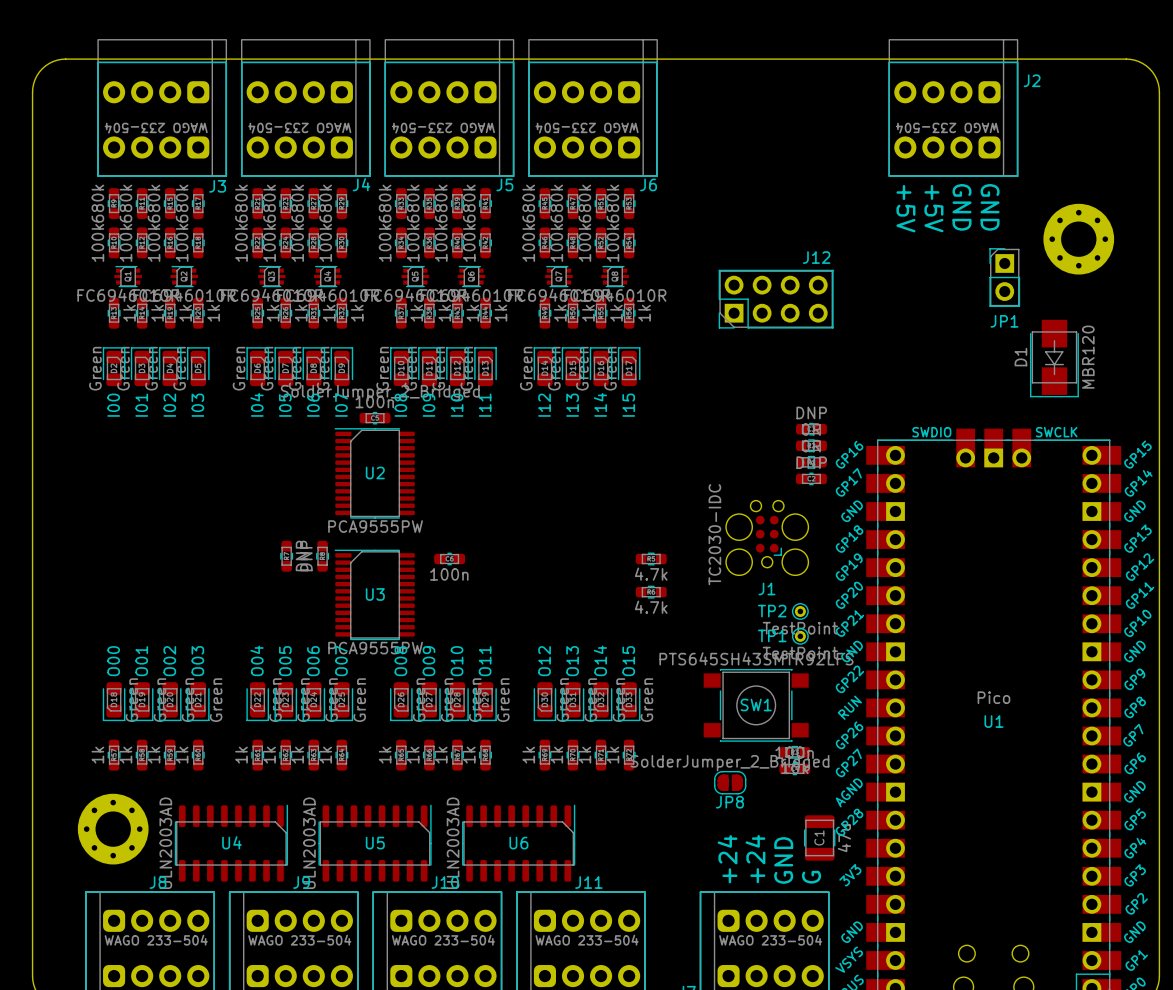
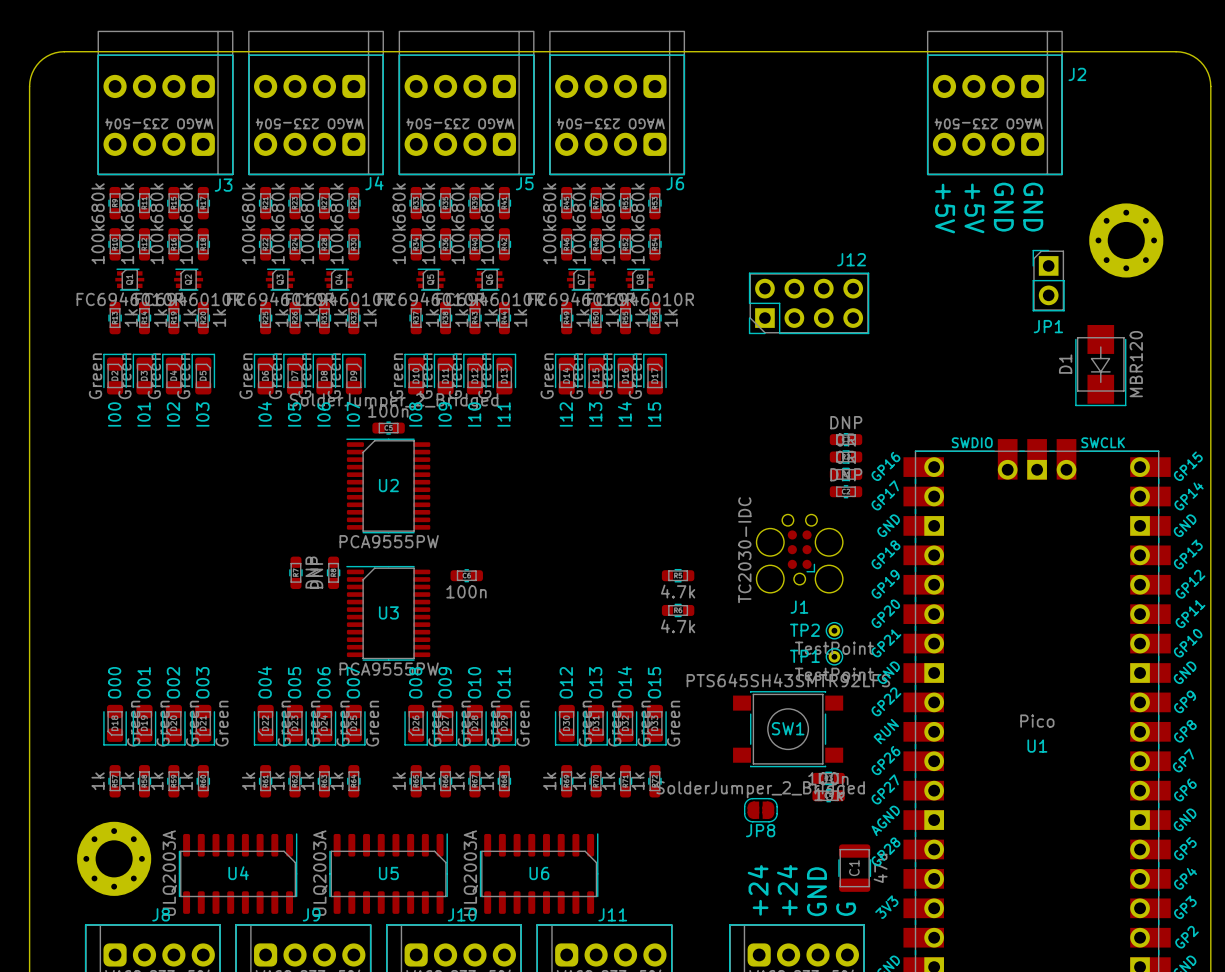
U4 value: ULN2003AD (165, 843) -> ULQ2003A (169, 873)
U5 value: ULN2003AD (309, 843) -> ULQ2003A (320, 873)
U6 value: ULN2003AD (453, 843) -> ULQ2003A (470, 873)

